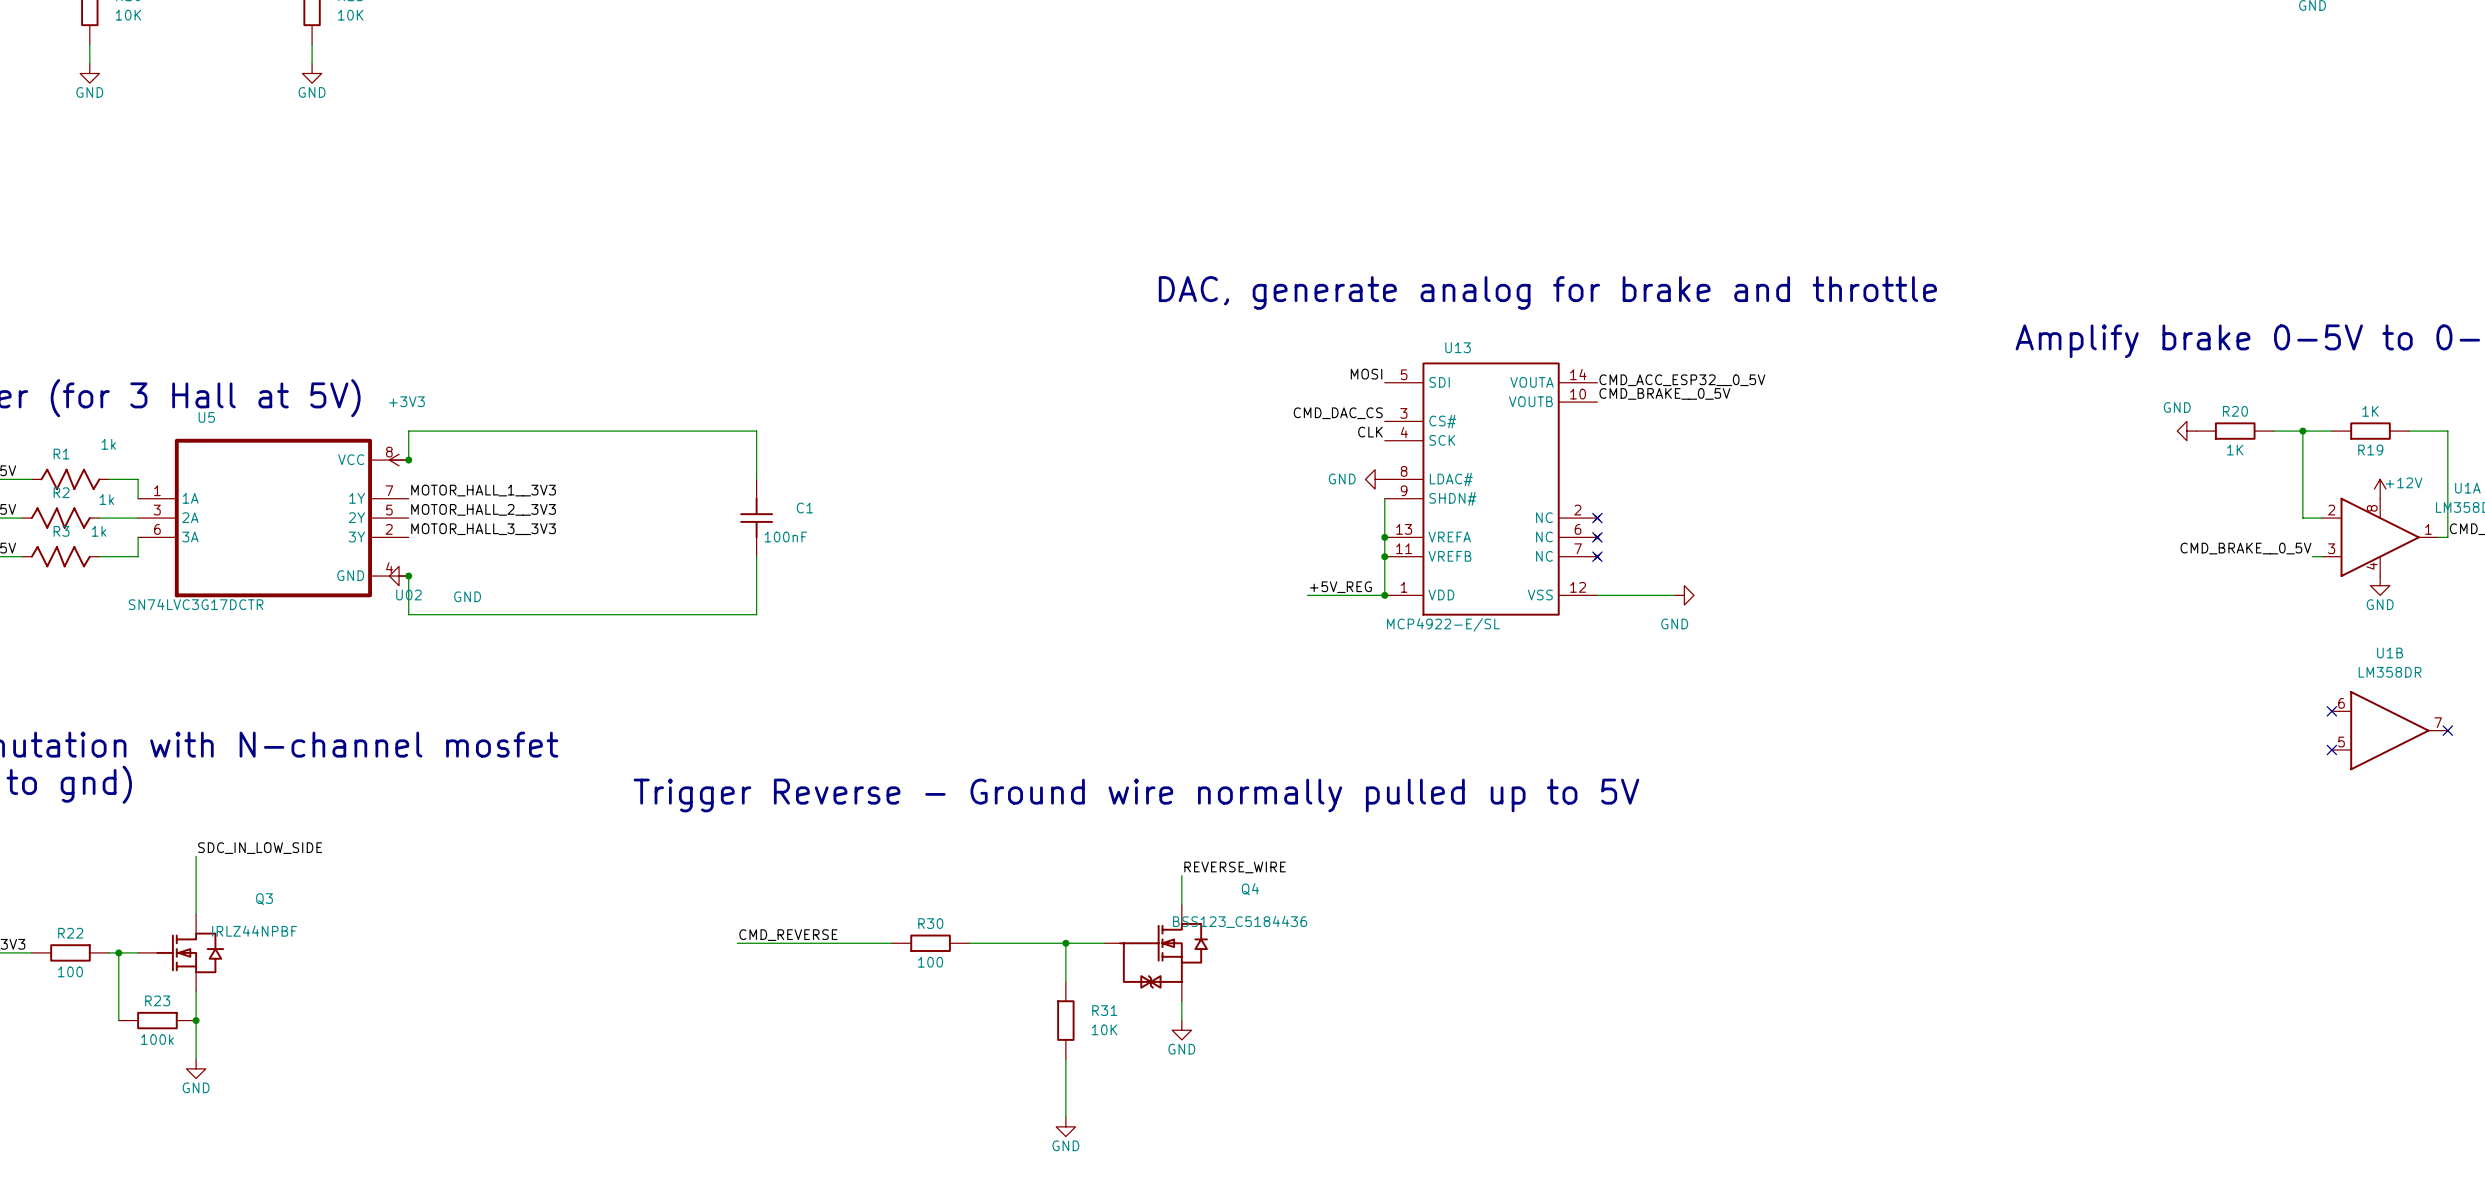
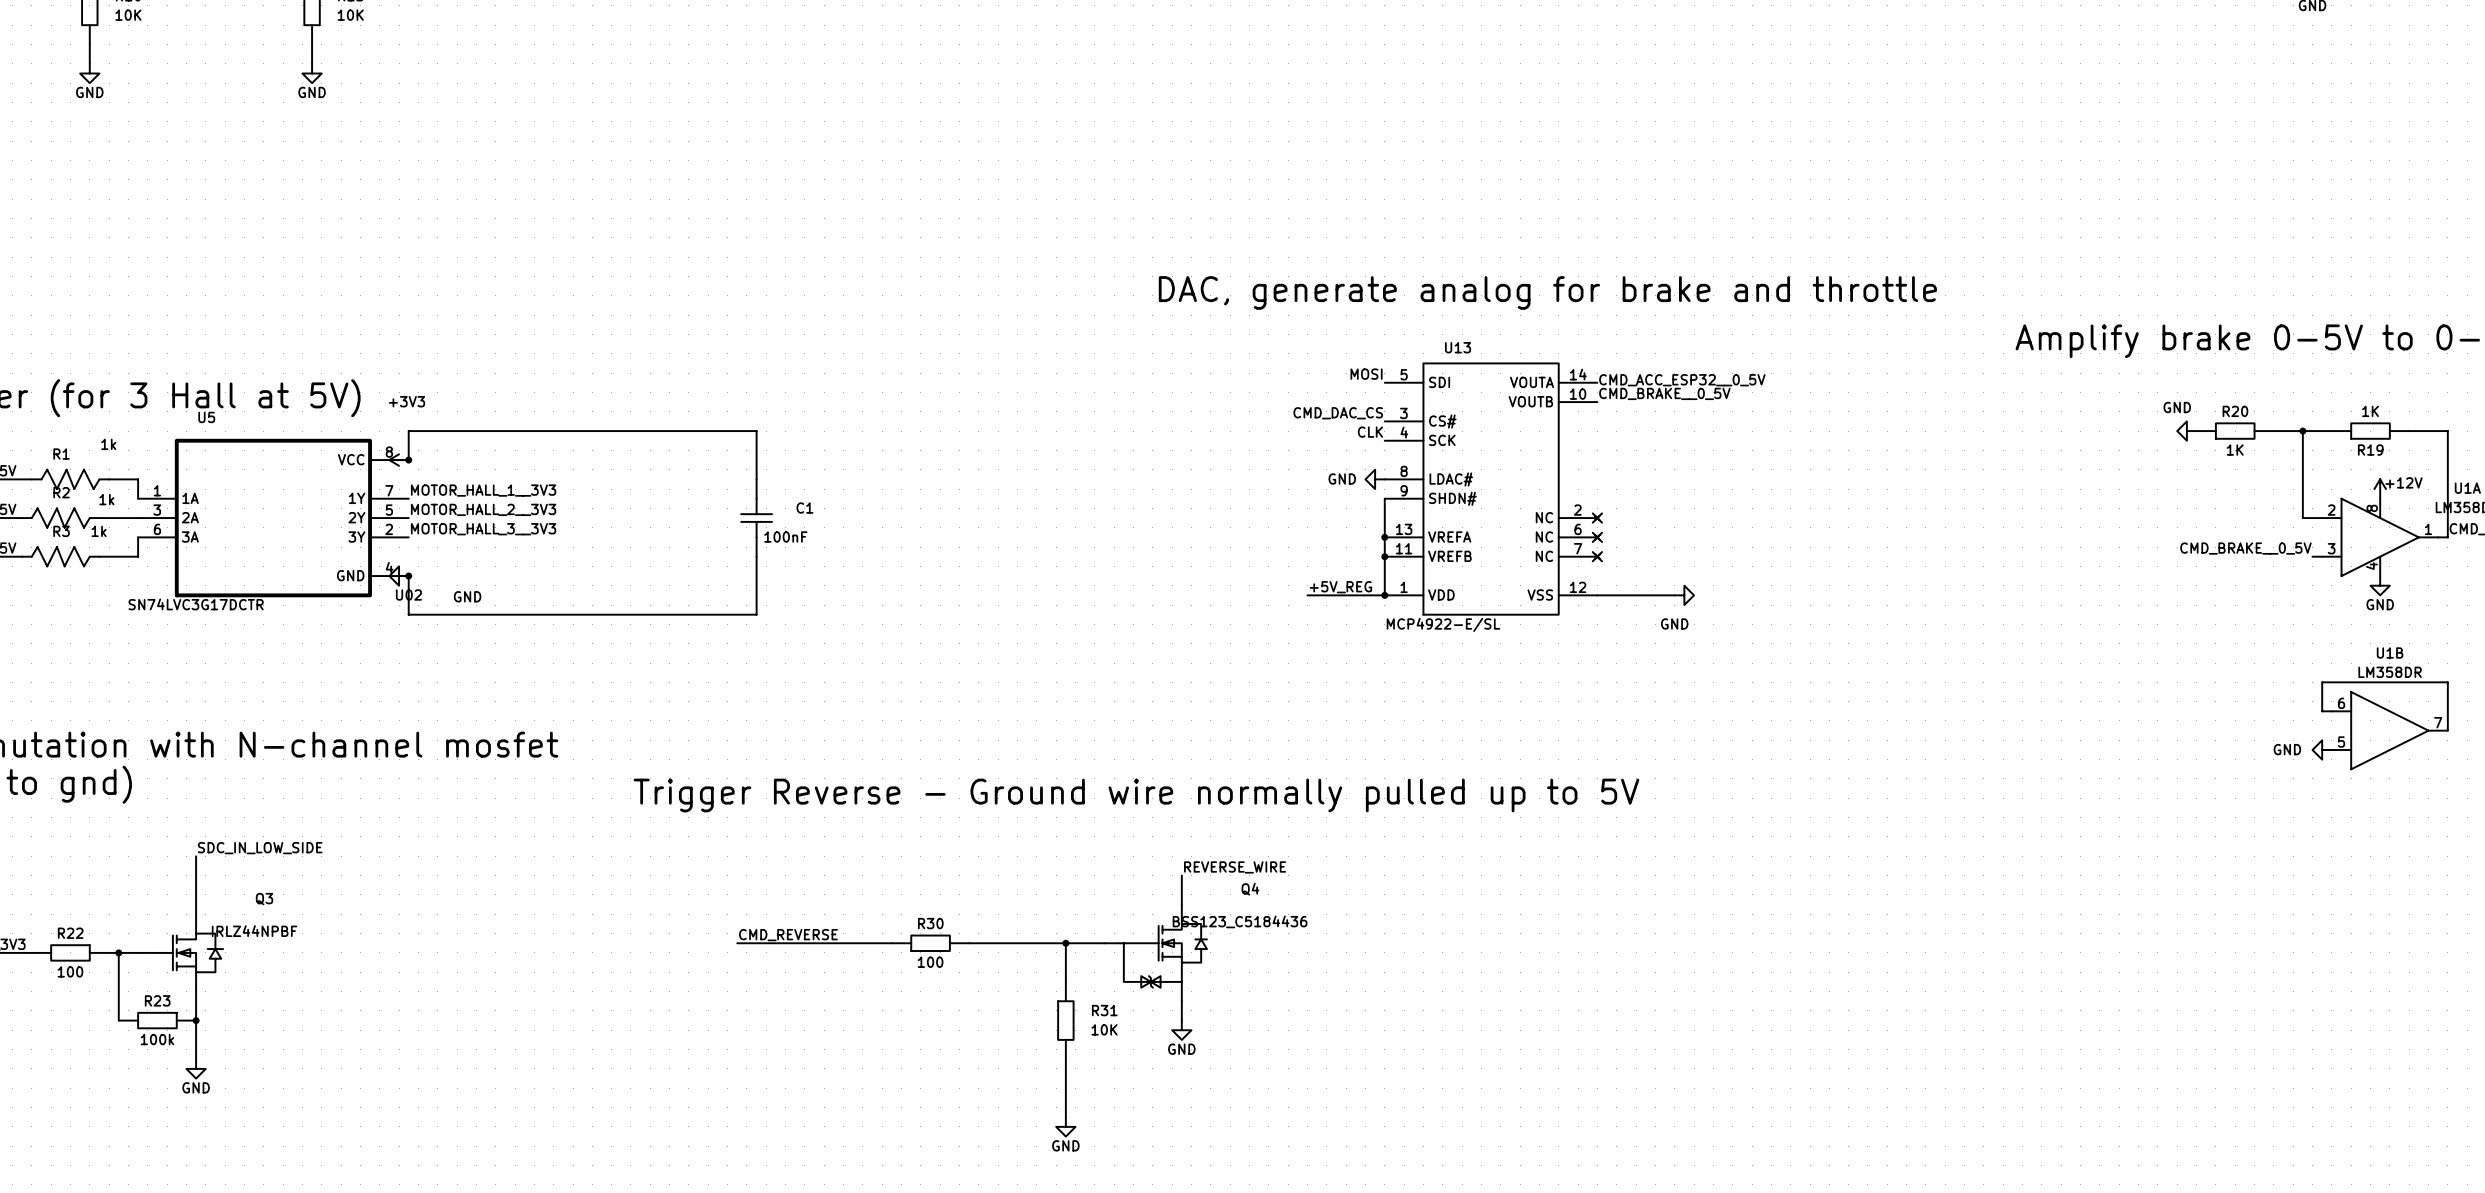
wire: none -> (2331, 711) (2322, 711) (2322, 682) (2447, 682) (2447, 730)
no-connect mark: (2331, 711) -> none
no-connect mark: (2447, 730) -> none
power symbol: none -> GND (2322, 749)
no-connect mark: (2331, 749) -> none

